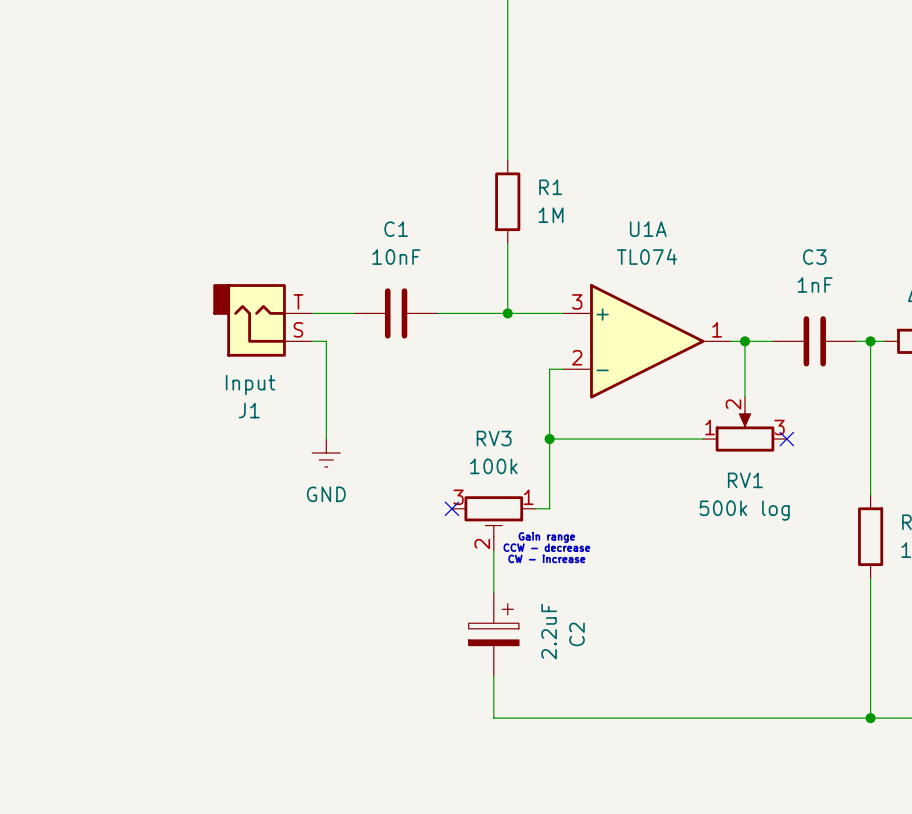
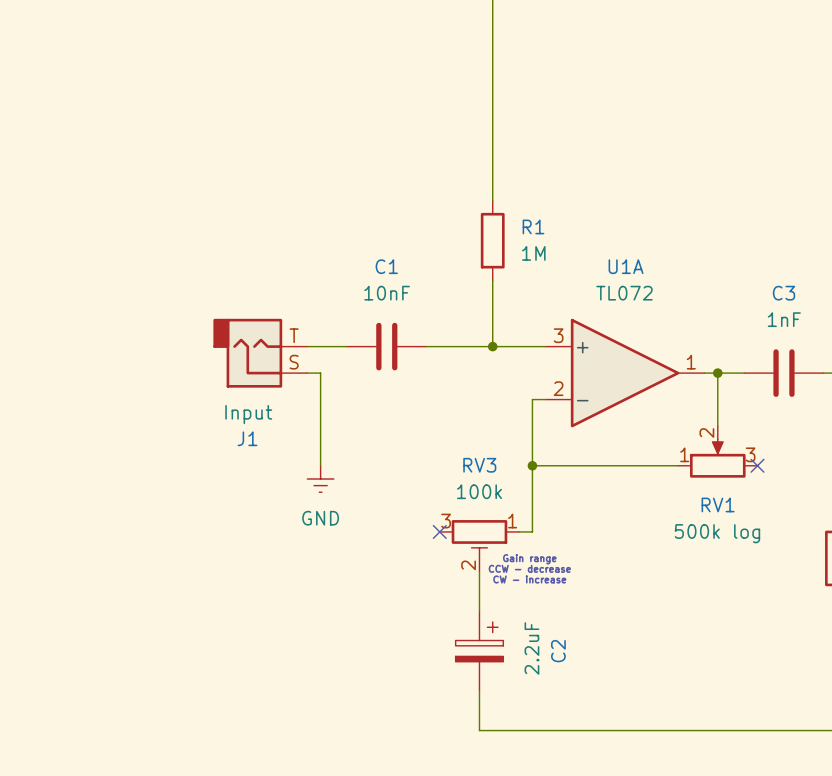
U1A value: TL074 (646, 256) -> TL072 (624, 293)

